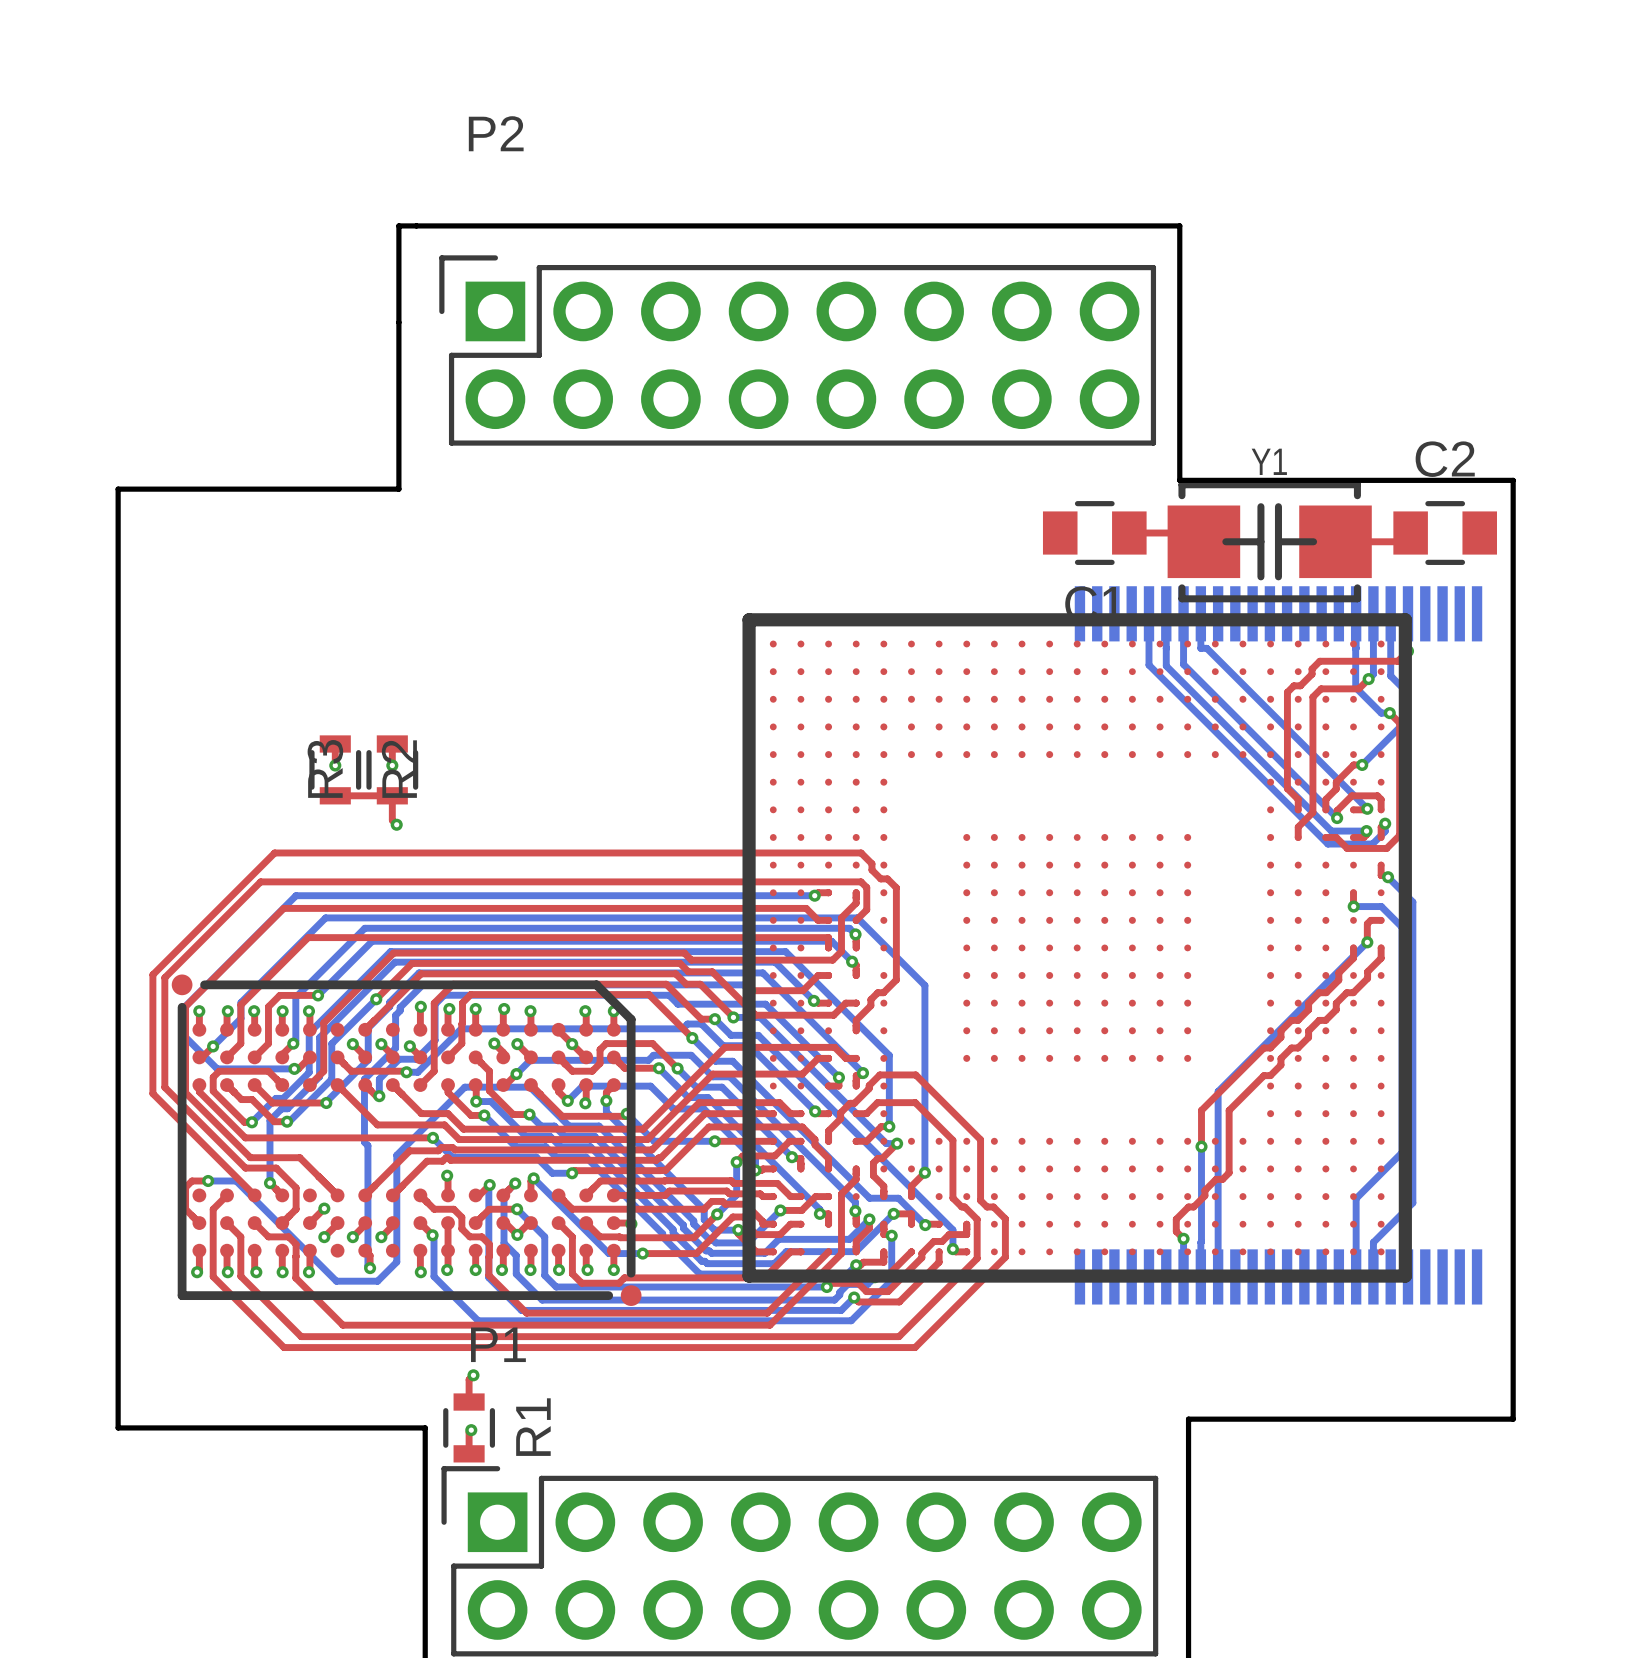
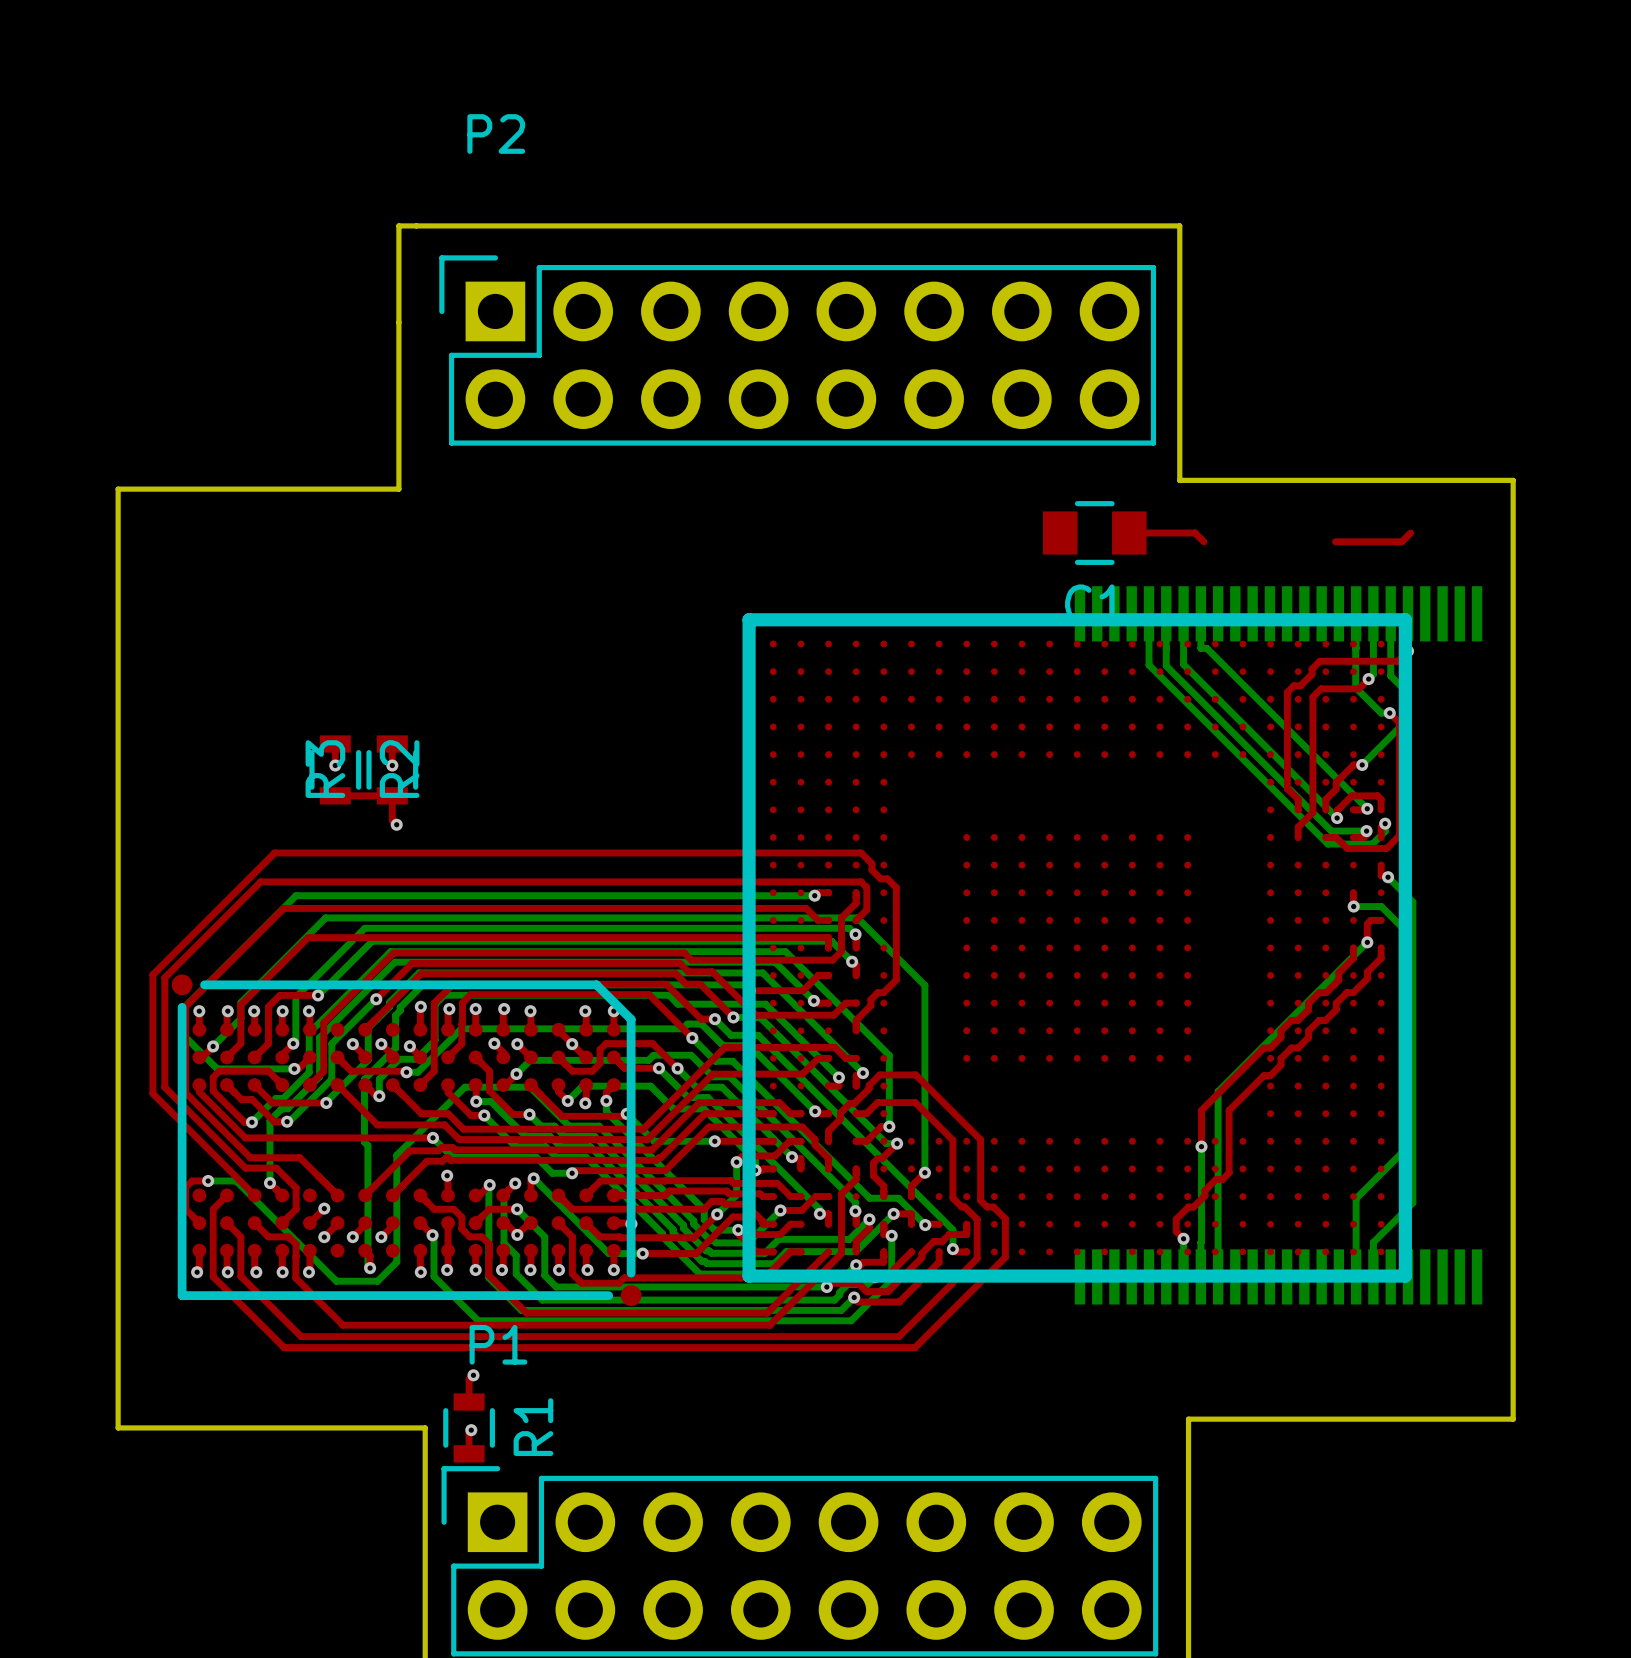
C2: (1445, 533) -> none
Y1: (1269, 541) -> none

